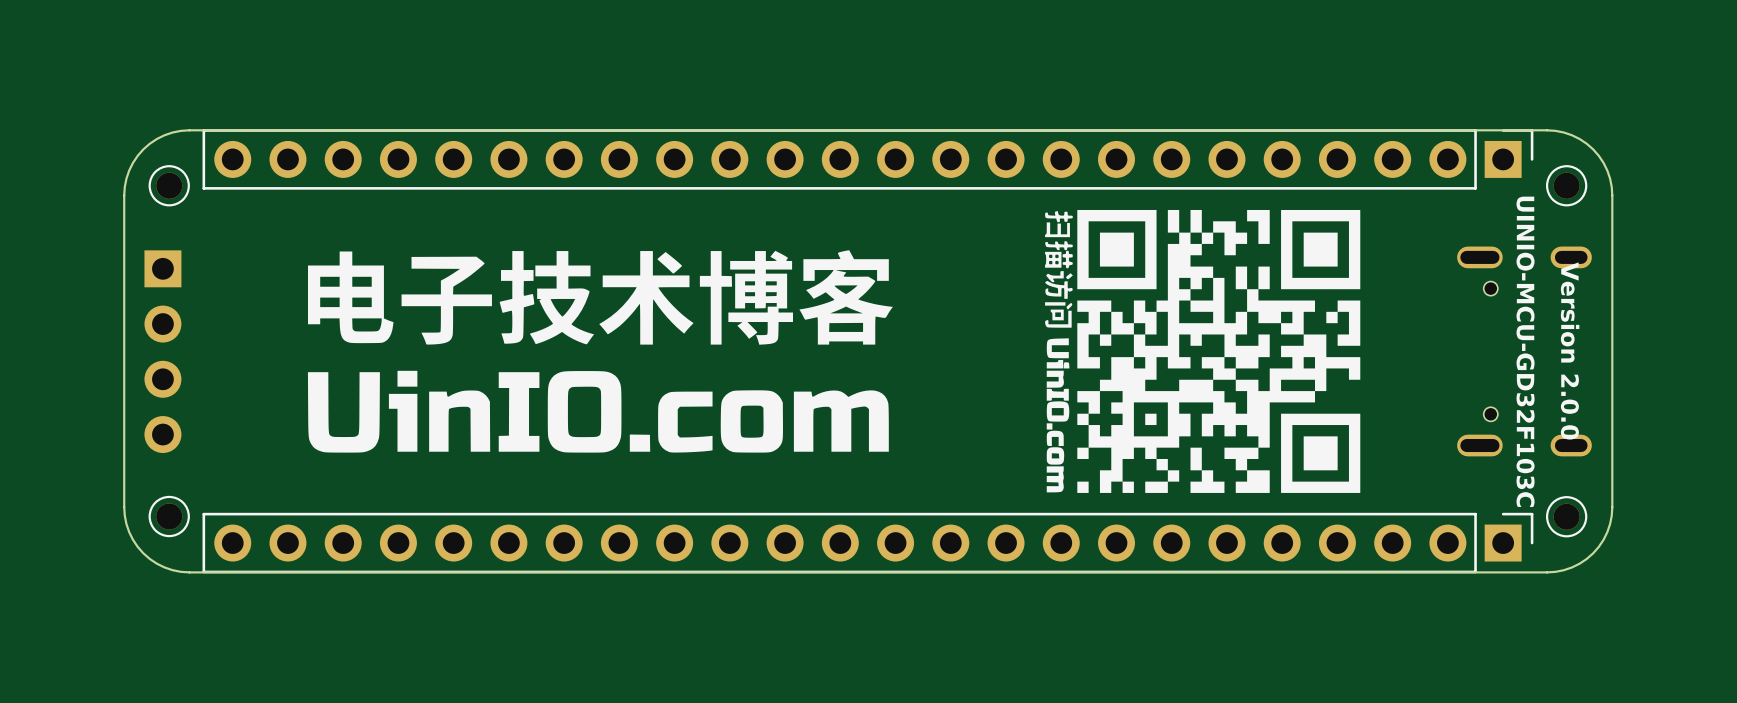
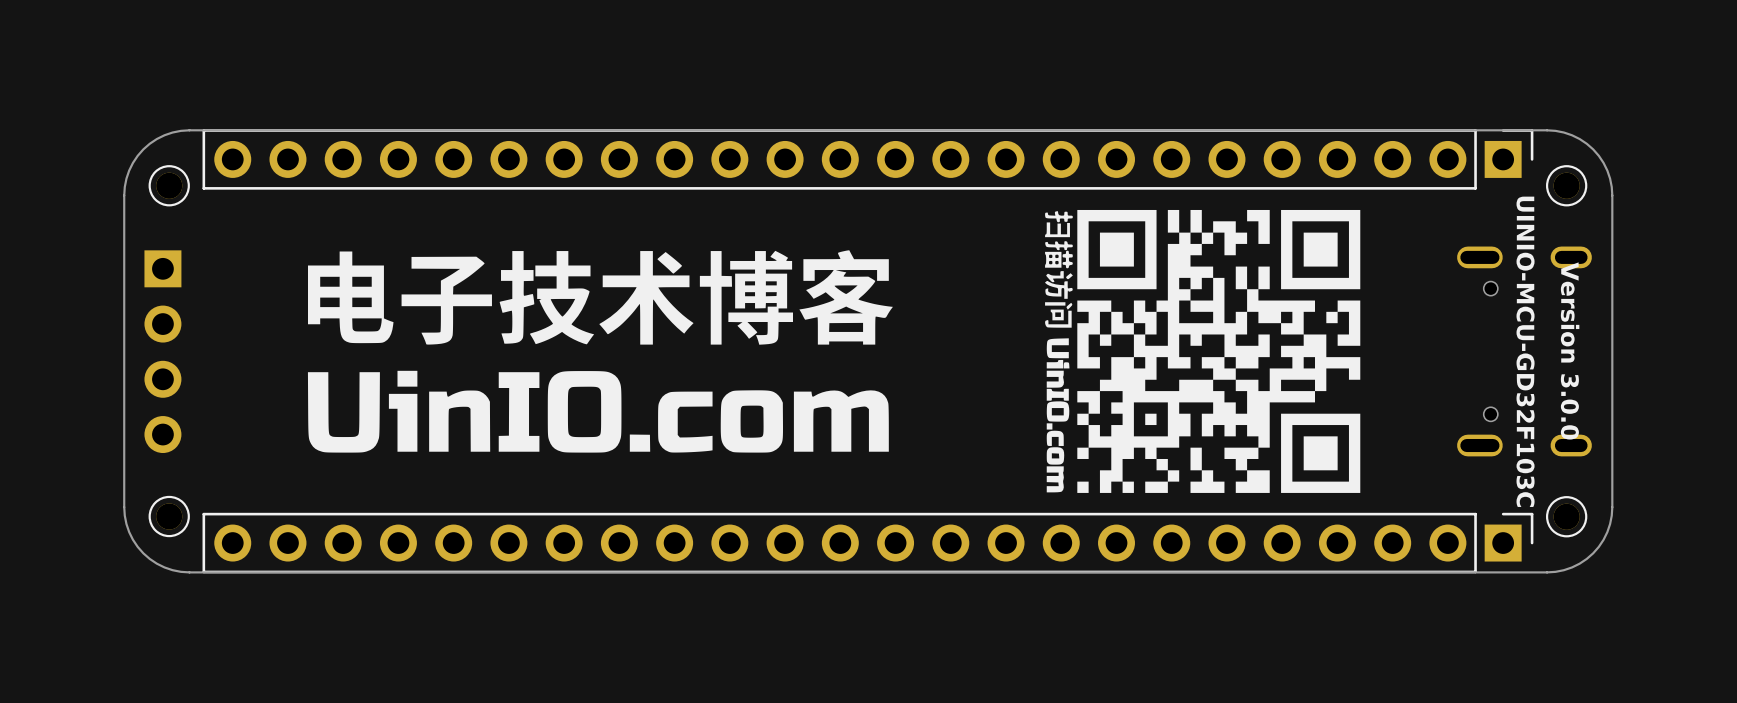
text: Version 2.0.0 (1570, 350) -> Version 3.0.0 (1570, 350)

